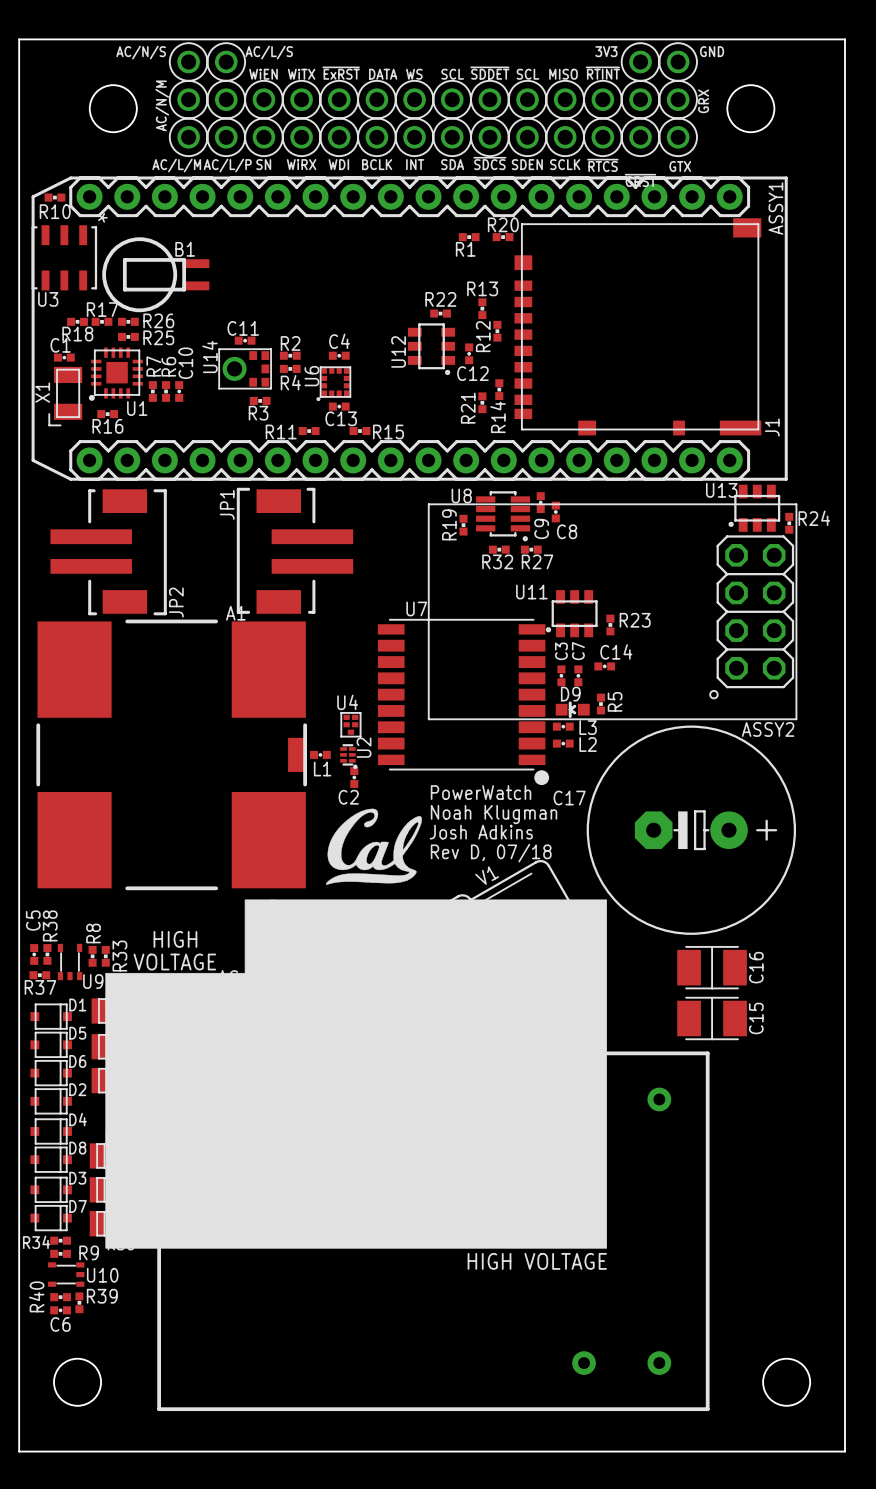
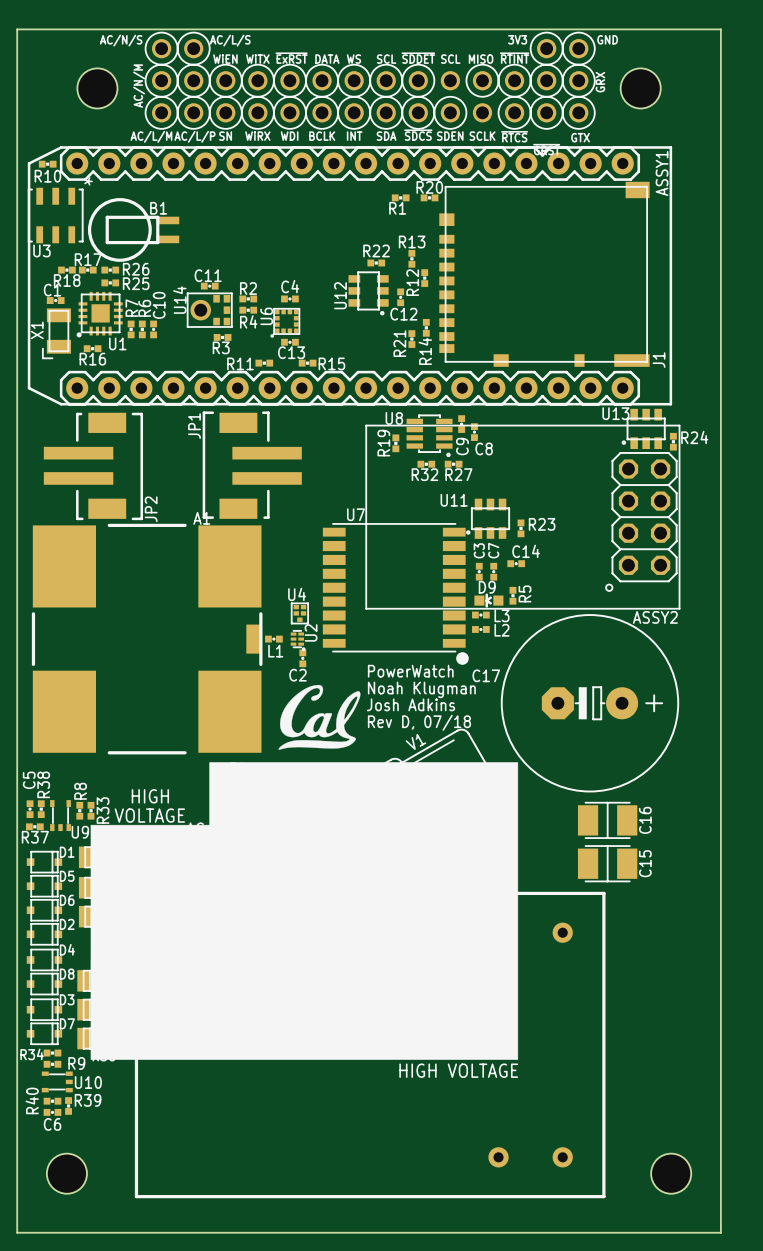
part side: top (527, 99) -> bottom (450, 80)
part side: top (565, 137) -> bottom (482, 112)

